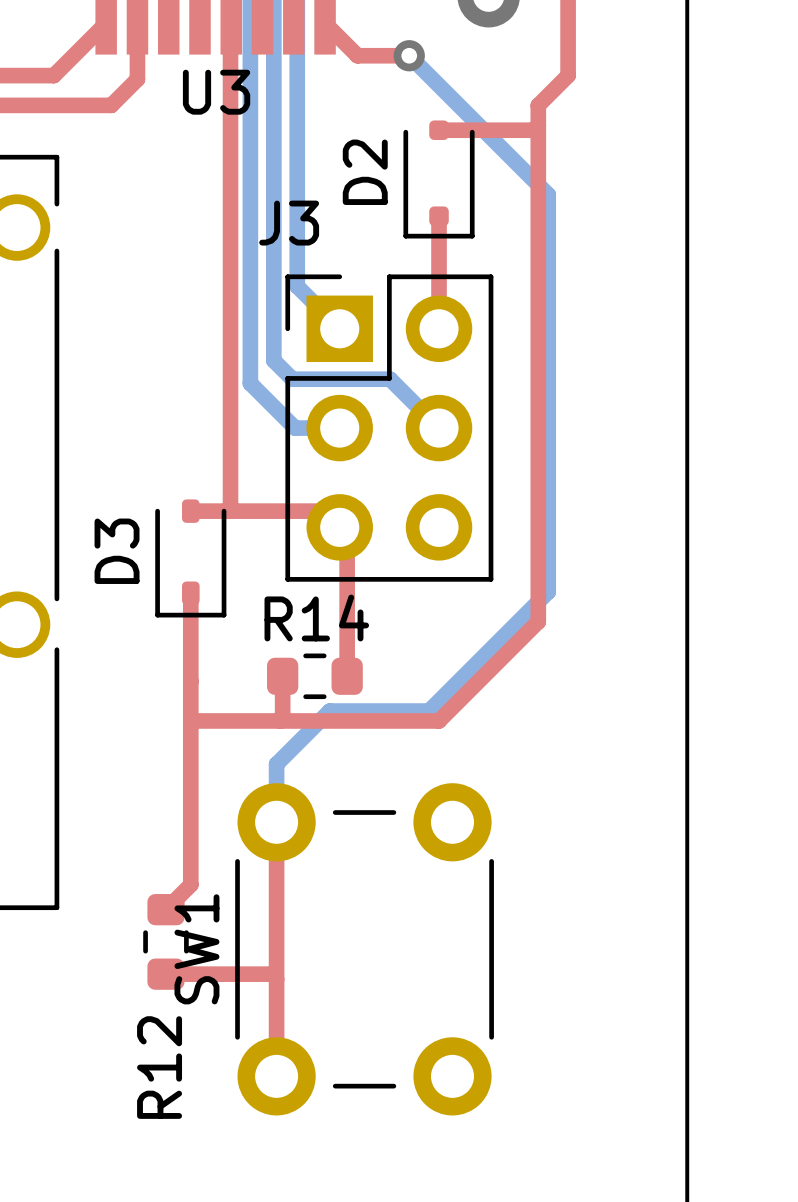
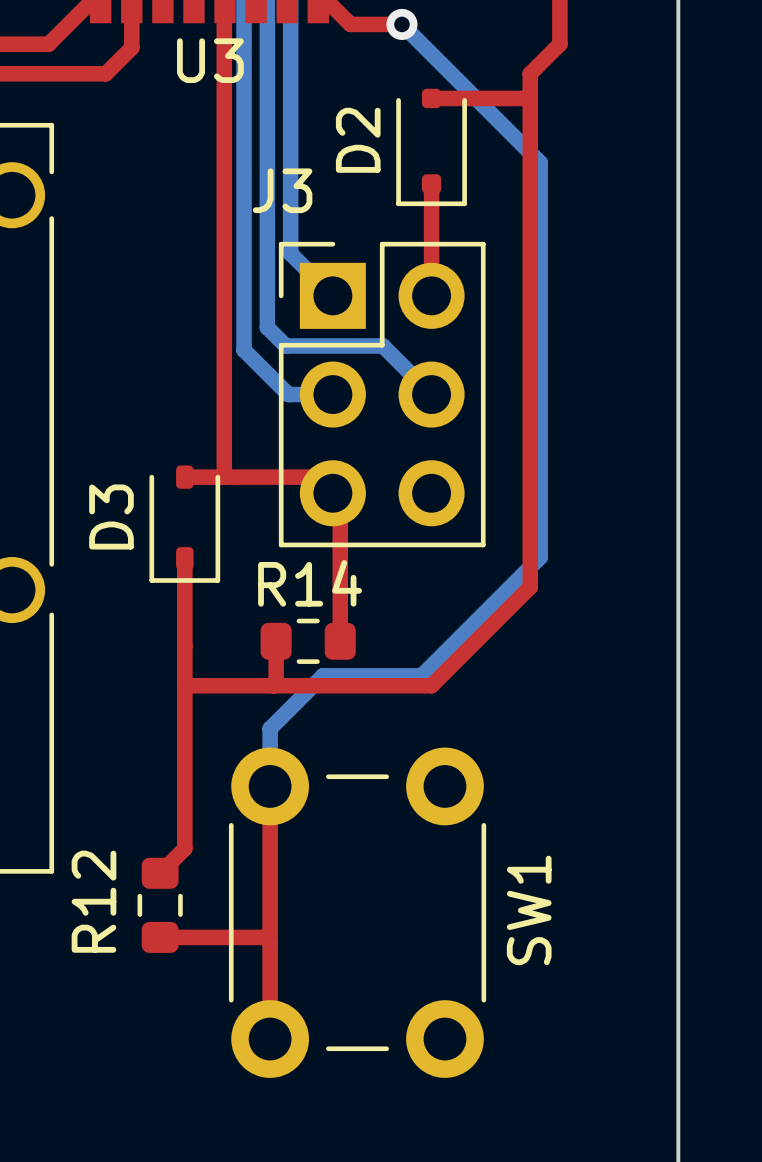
SW1 name position: SW1 (196, 949) -> SW1 (529, 910)
R12 name position: R12 (159, 1067) -> R12 (94, 901)

